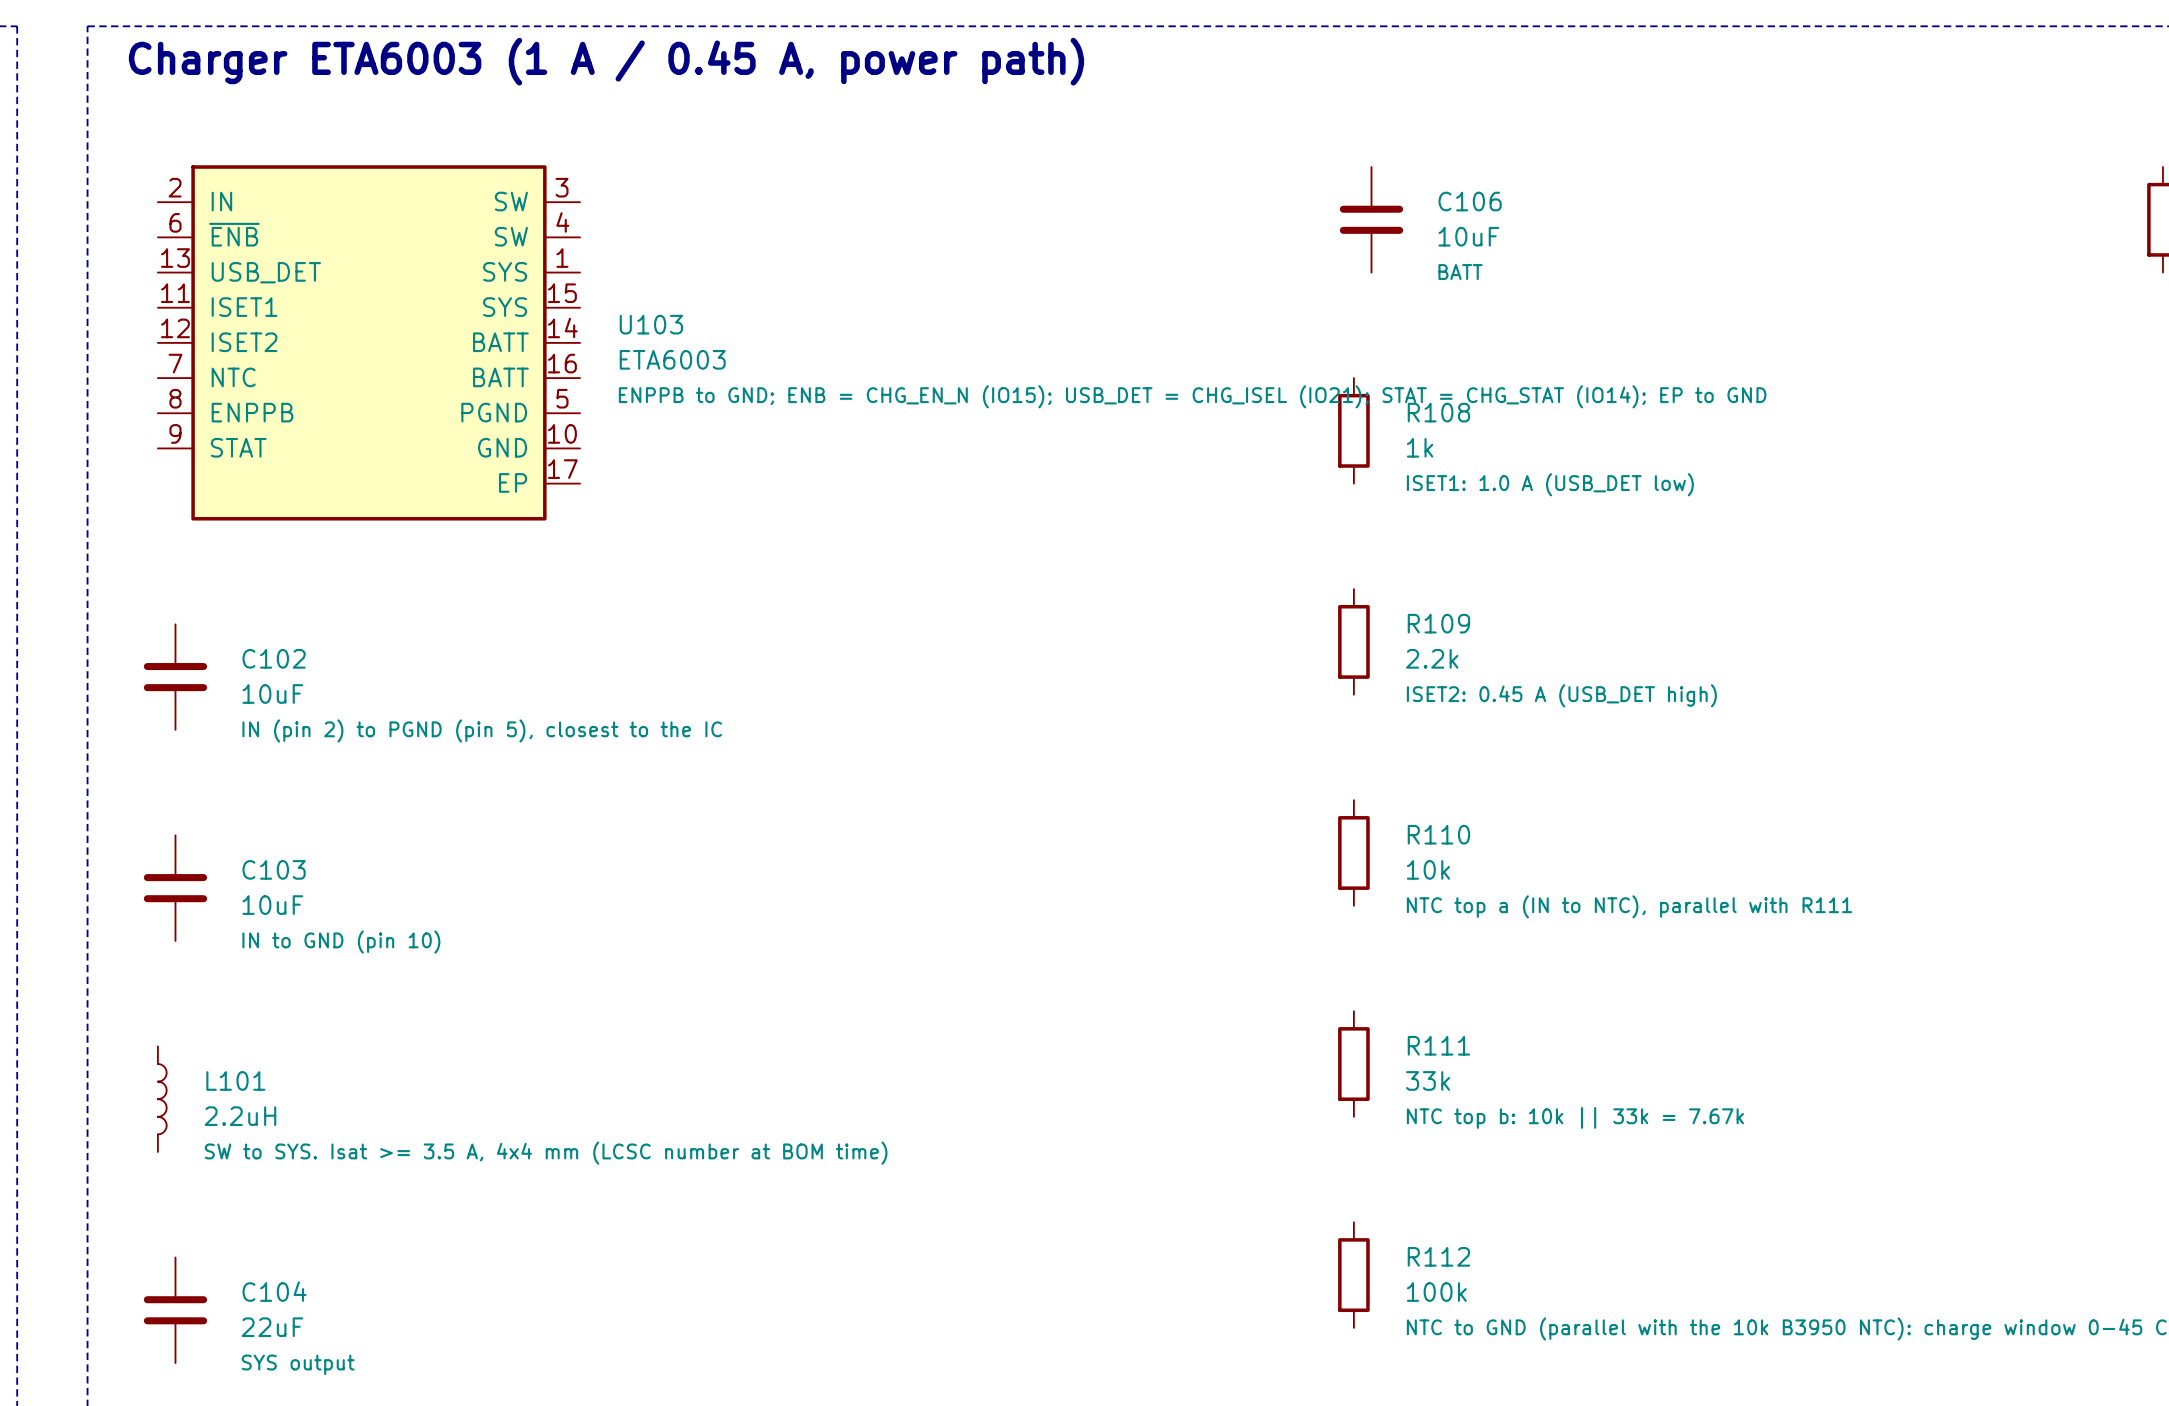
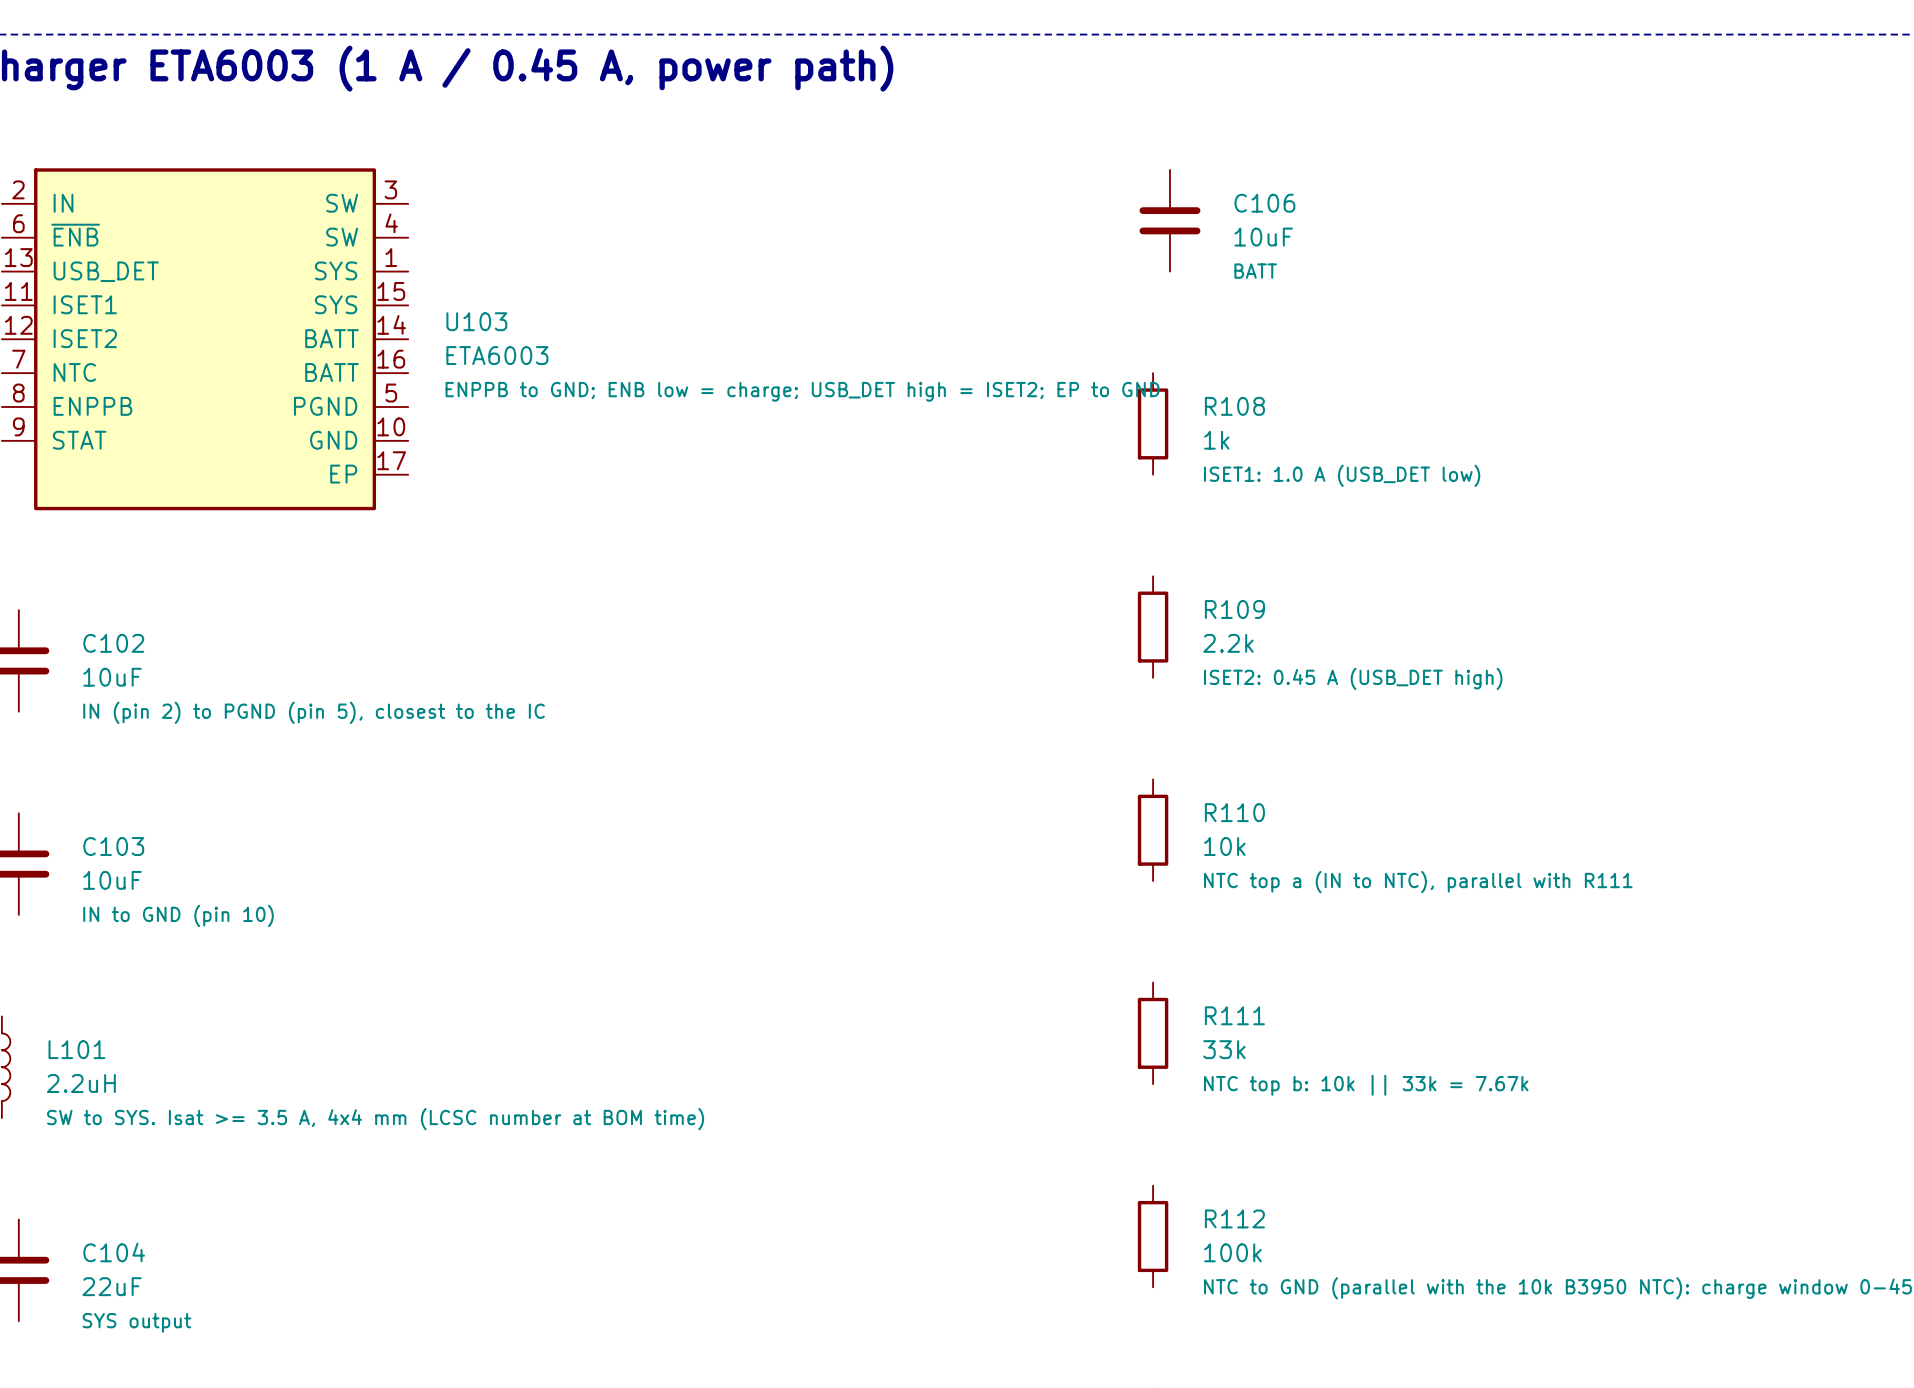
U103 text: ENPPB to GND; ENB = CHG_EN_N (IO15); USB_DET = CHG_ISEL (IO21); STAT = CHG_STAT (IO14); EP to GND (1192, 396) -> ENPPB to GND; ENB low = charge; USB_DET high = ISET2; EP to GND (802, 391)

